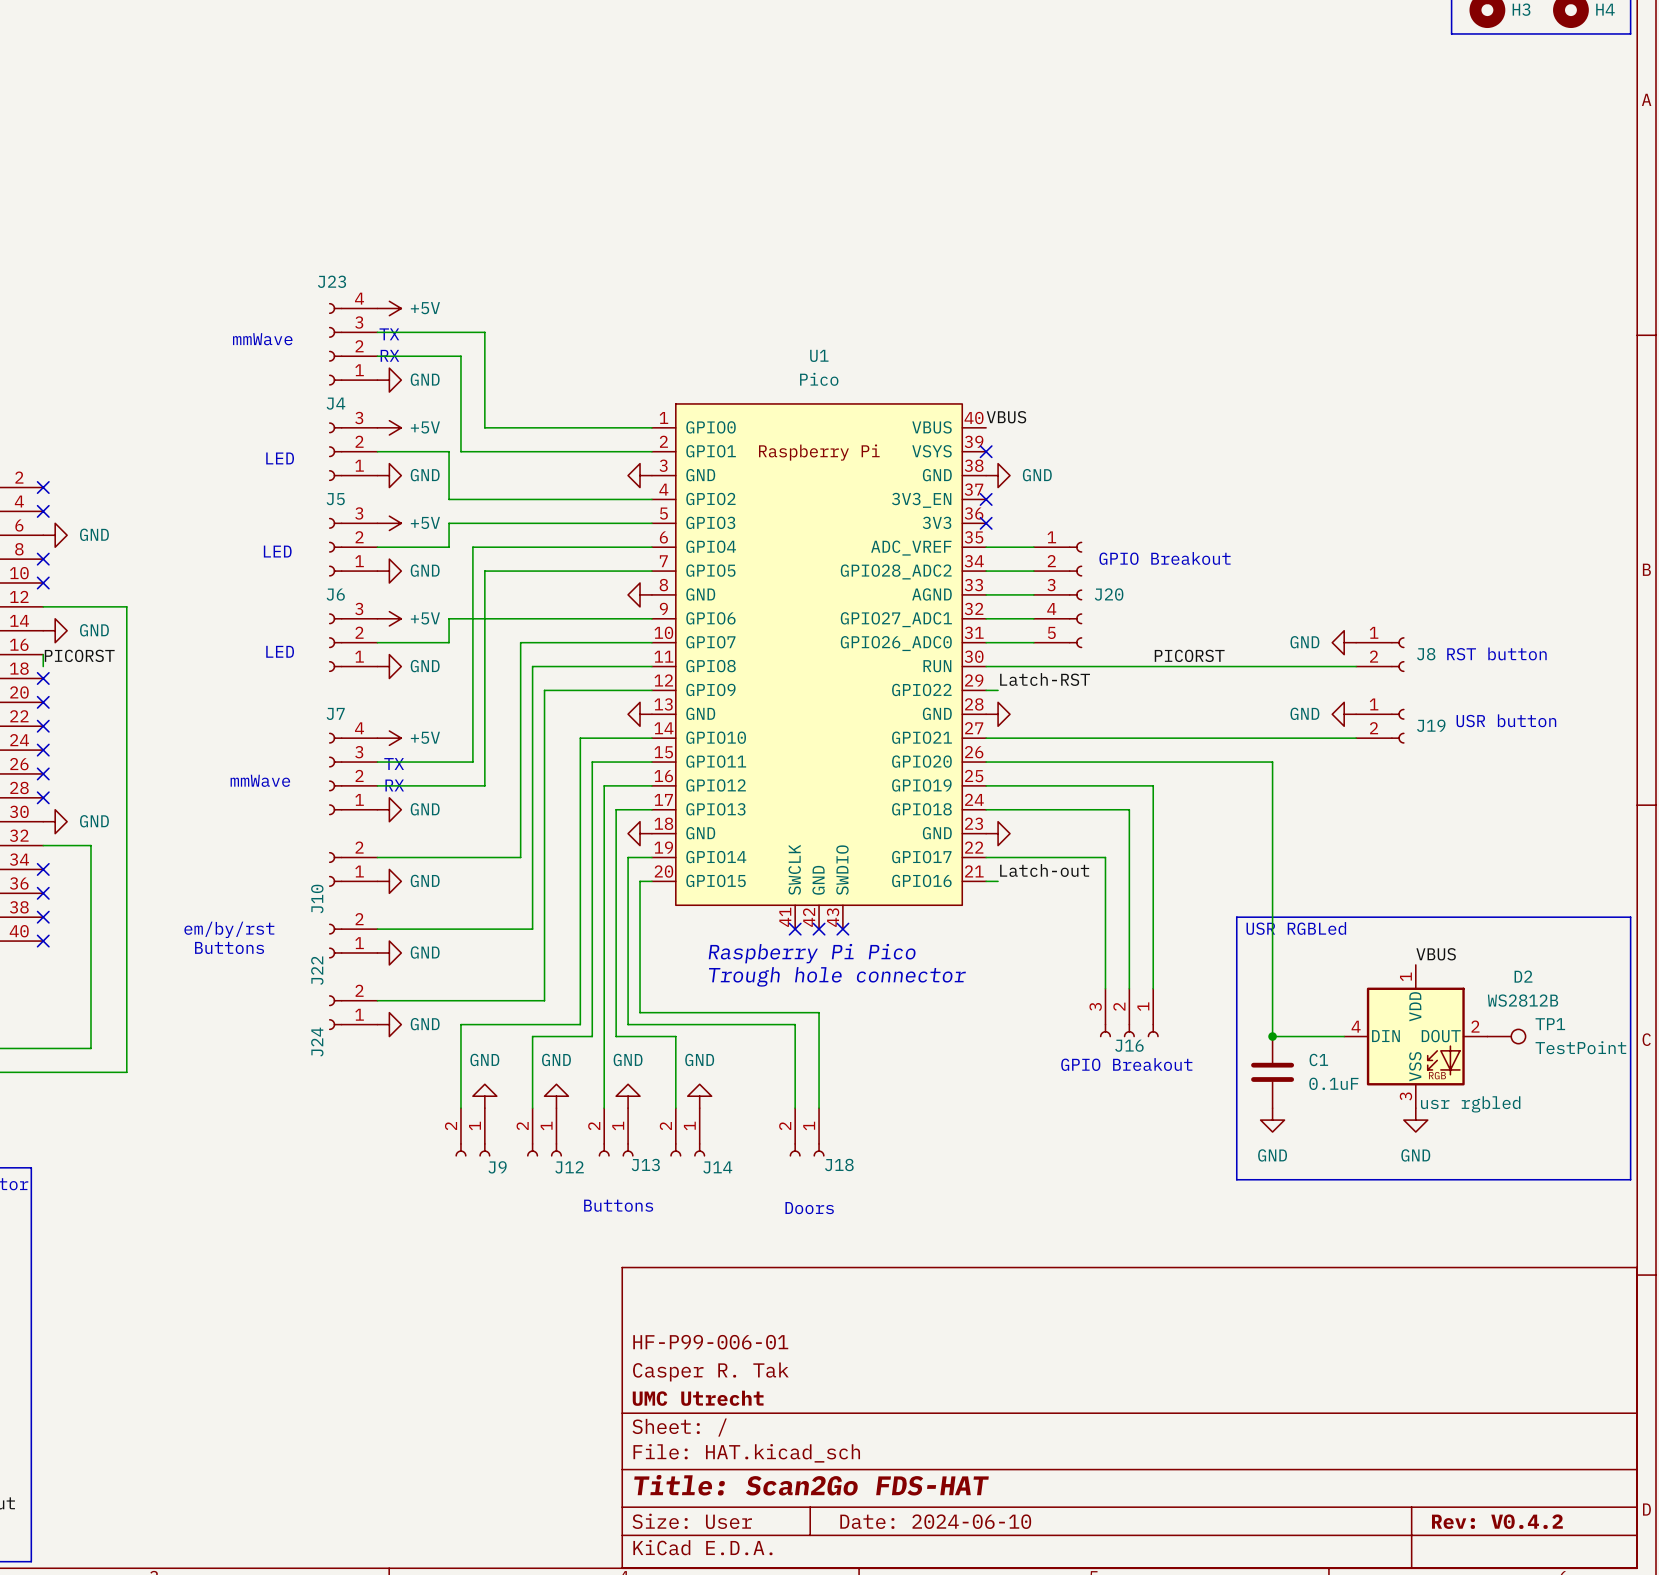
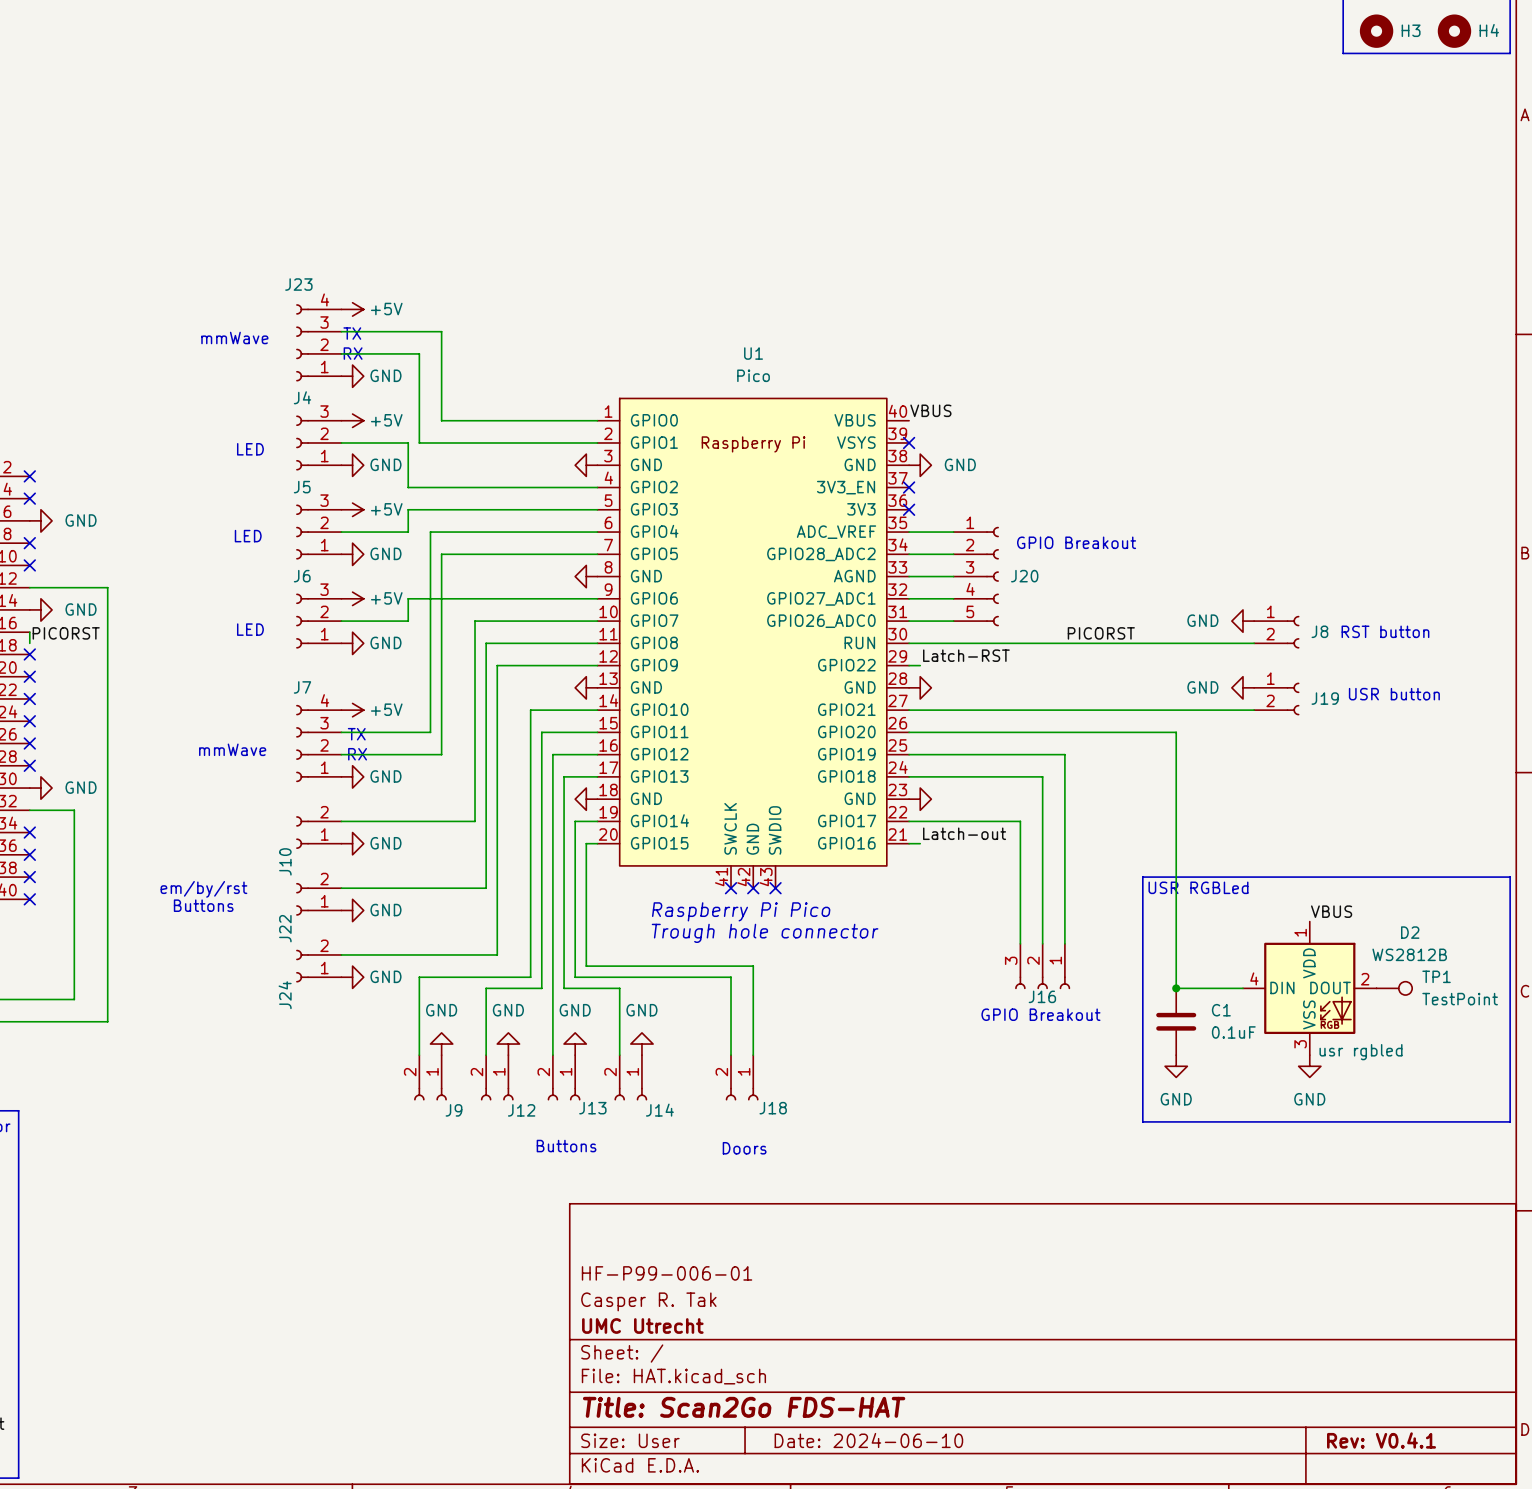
title block: Rev: V0.4.2 (1497, 1521) -> Rev: V0.4.1 (1381, 1440)

